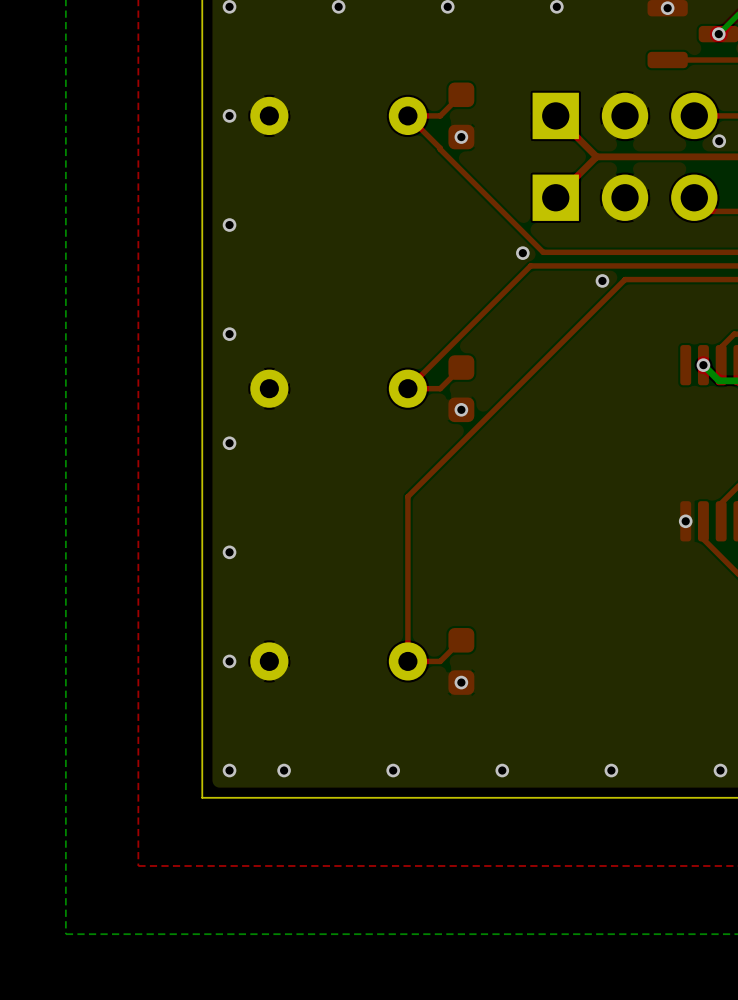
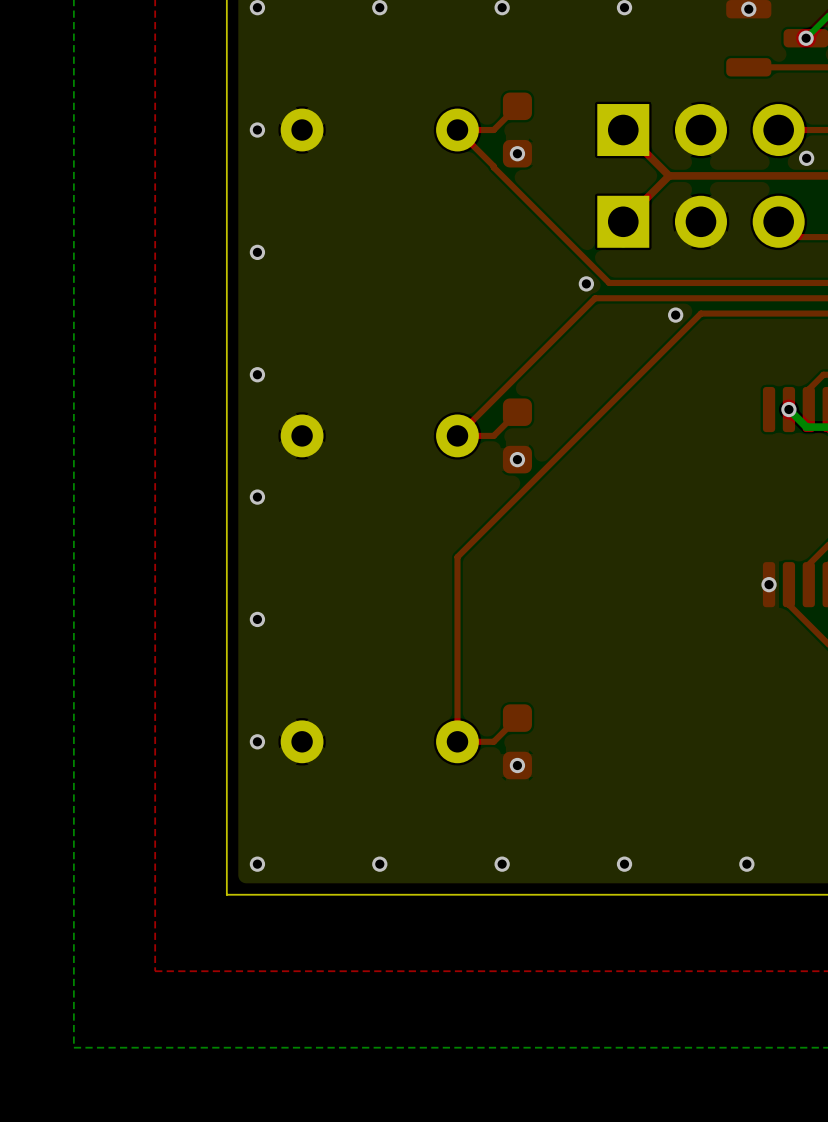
via: (284, 770) -> none
via: none -> (379, 864)
via: (393, 770) -> none
via: none -> (502, 864)
via: (502, 770) -> none
via: none -> (624, 864)
via: (611, 770) -> none
via: none -> (746, 864)
via: (720, 770) -> none

